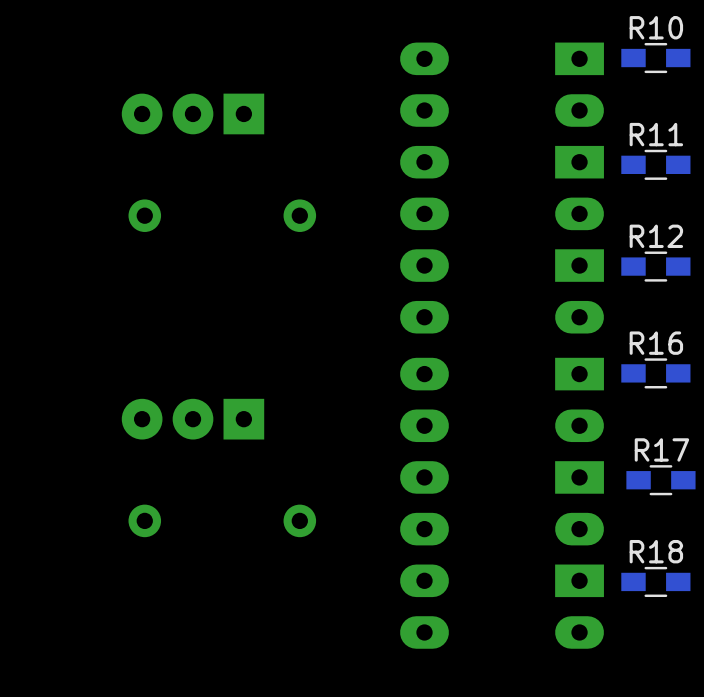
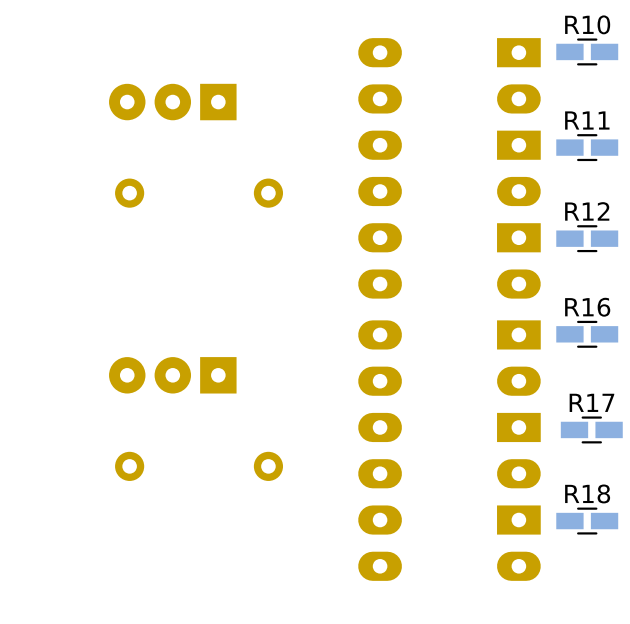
R10 footprint: [621, 42, 691, 74] -> [556, 38, 619, 66]
R11 footprint: [621, 149, 691, 180] -> [556, 134, 619, 162]
R12 footprint: [621, 251, 691, 282] -> [556, 225, 619, 253]
R16 footprint: [621, 358, 691, 389] -> [556, 320, 619, 348]
R17 footprint: [626, 465, 696, 496] -> [560, 416, 623, 444]
R18 footprint: [621, 566, 691, 598] -> [556, 507, 619, 535]

